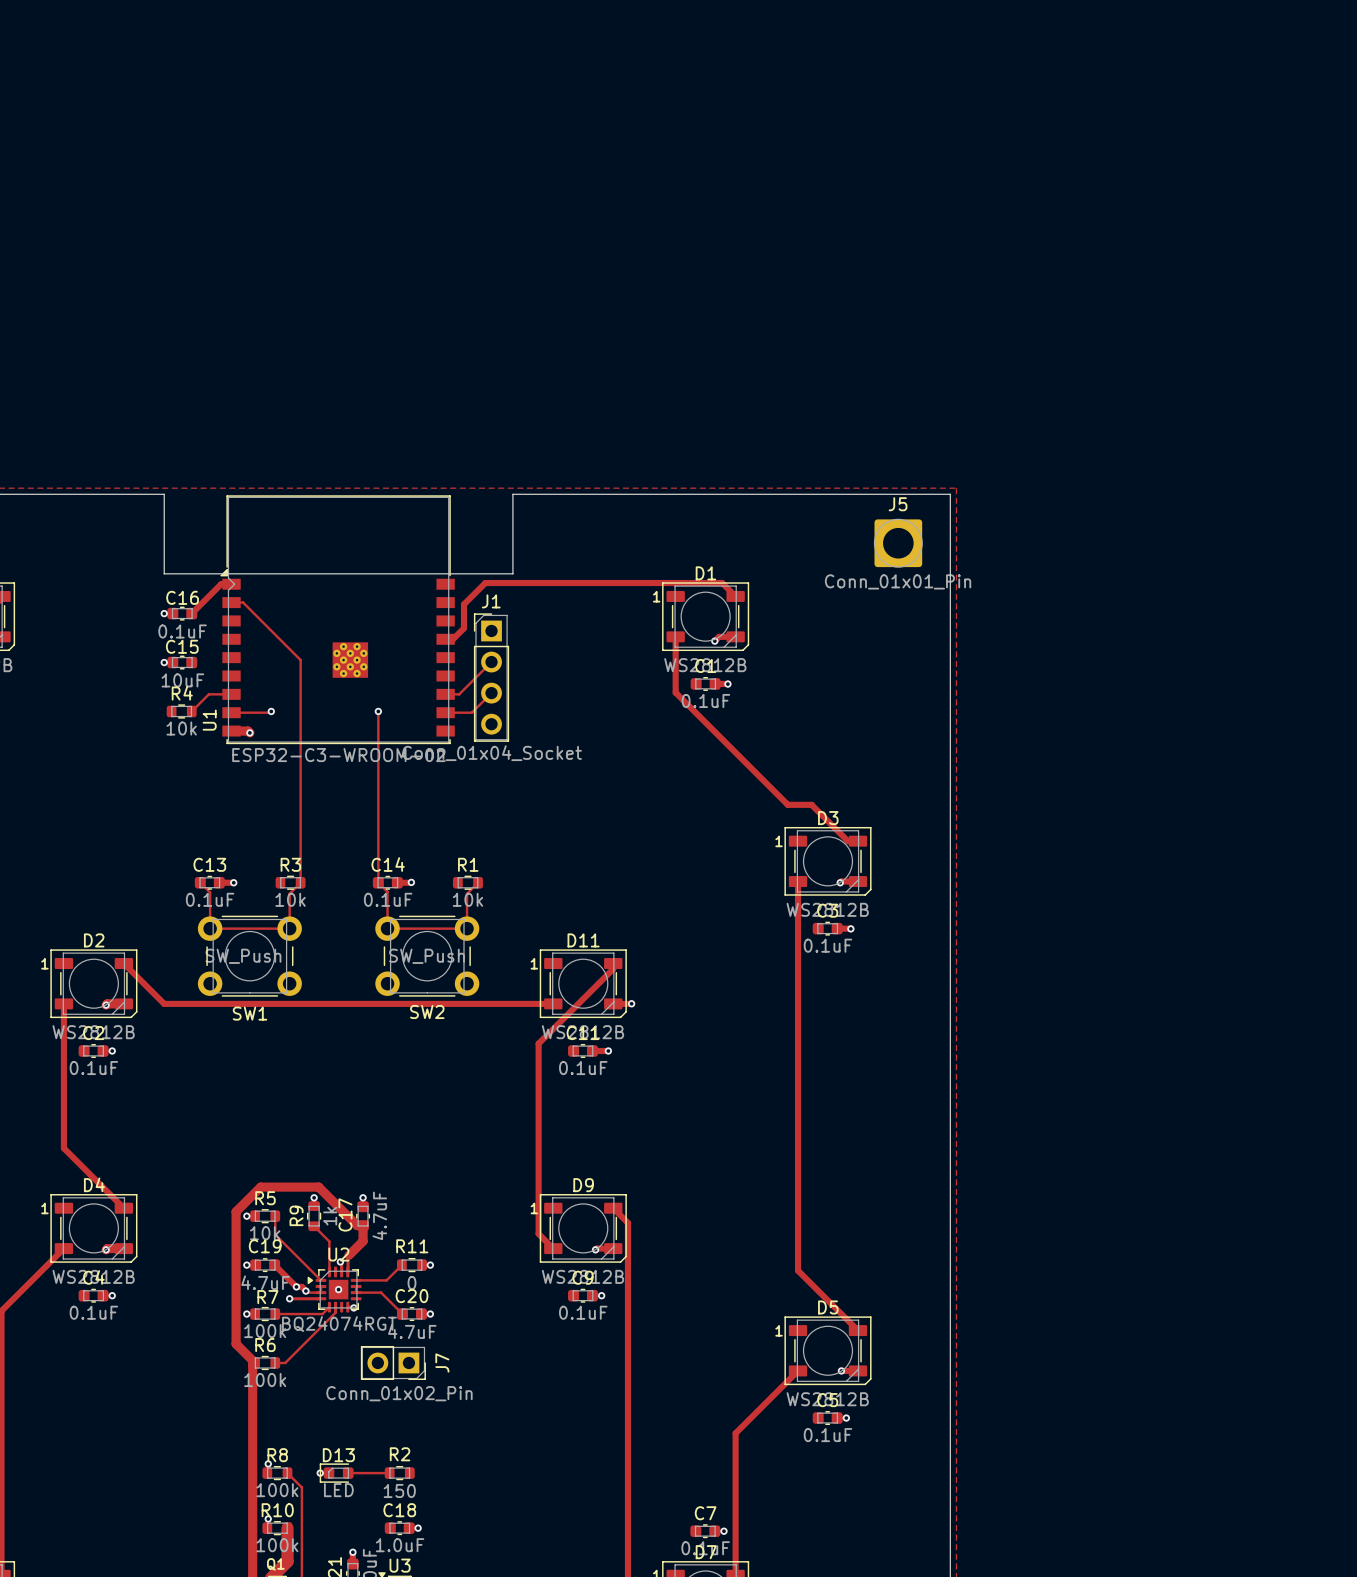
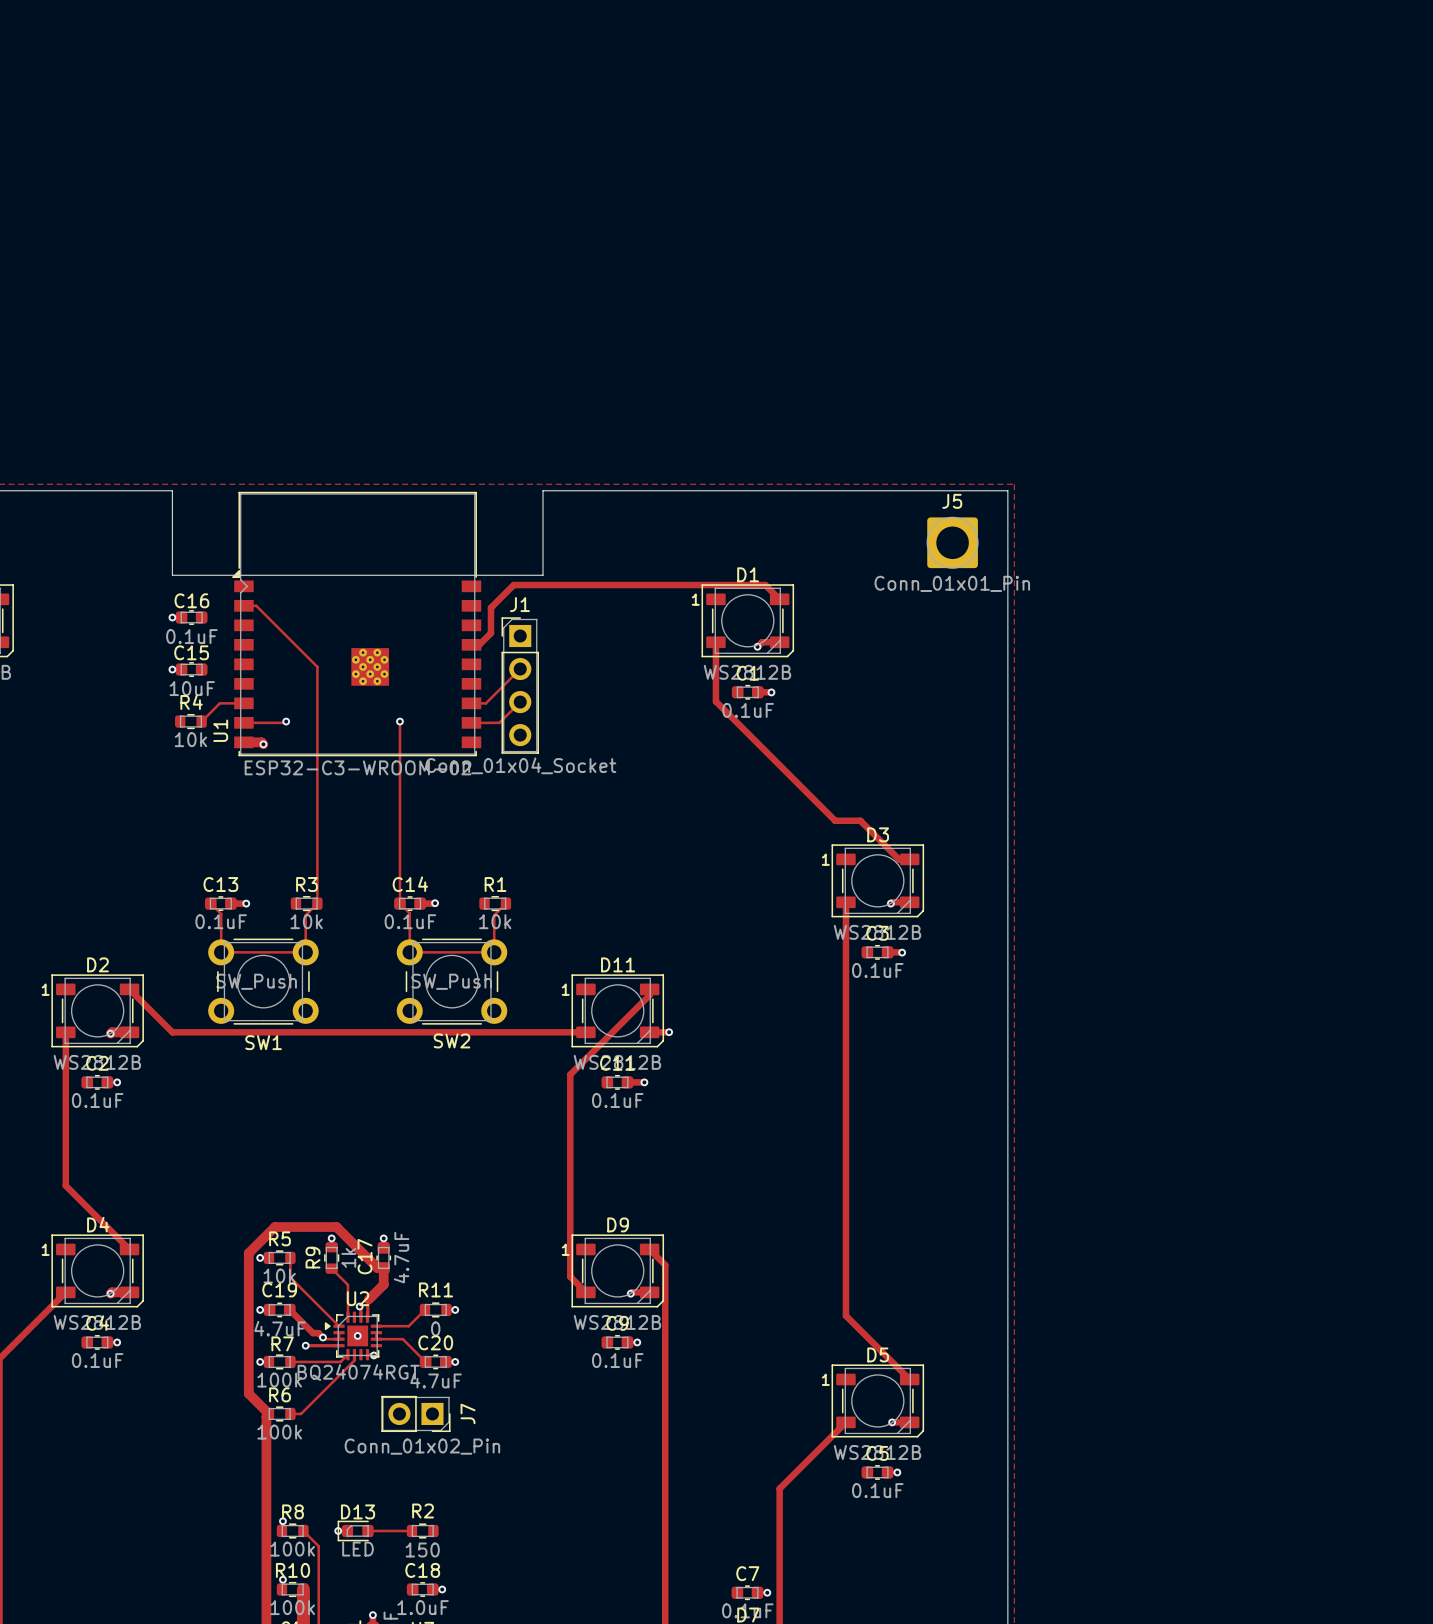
track: (231, 584) (221, 584) (191, 613) -> none
via: (296, 1286) -> none

